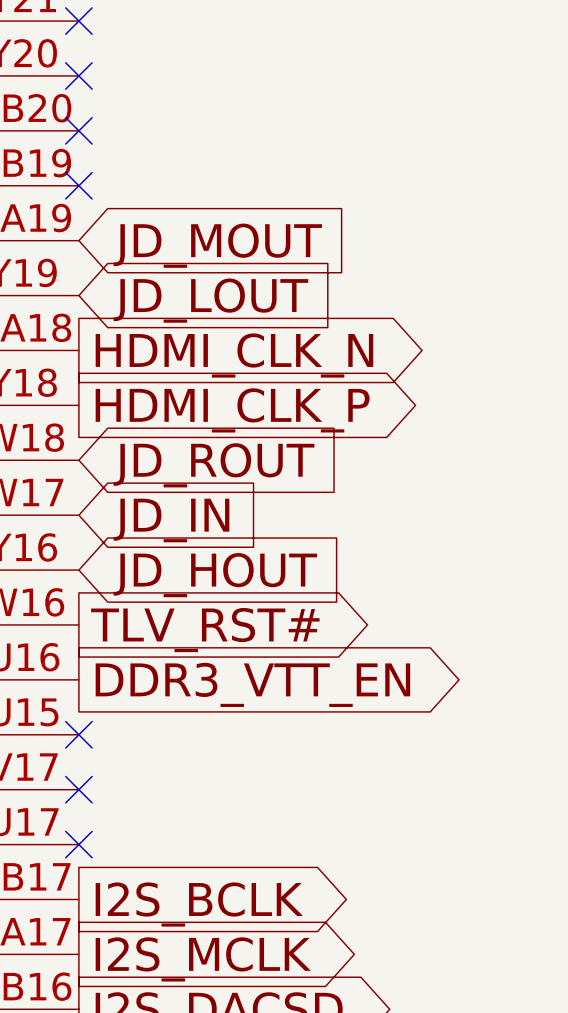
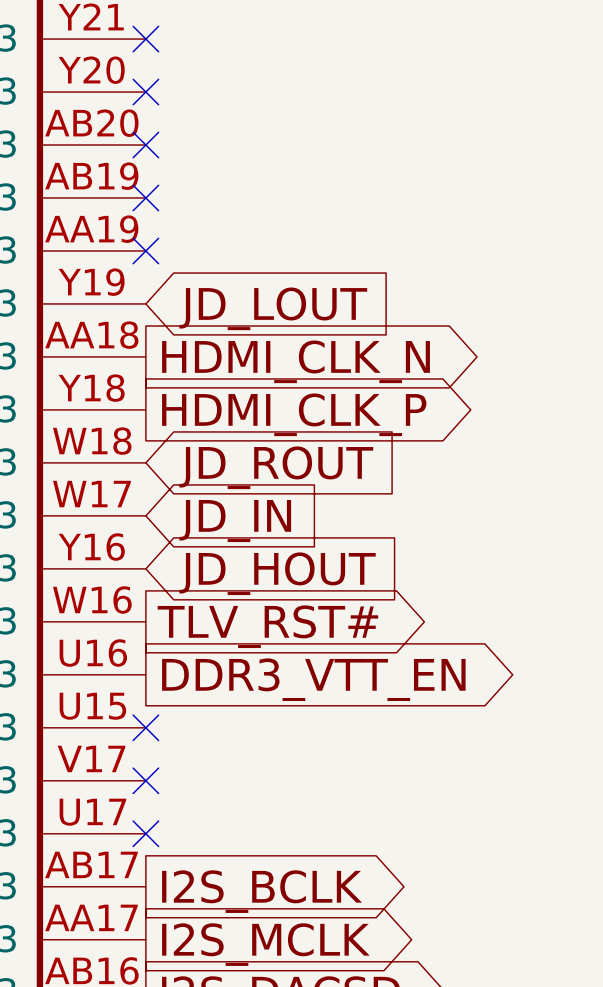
no-connect mark: none -> (145, 250)
global label: JD_MOUT (217, 245) -> none

